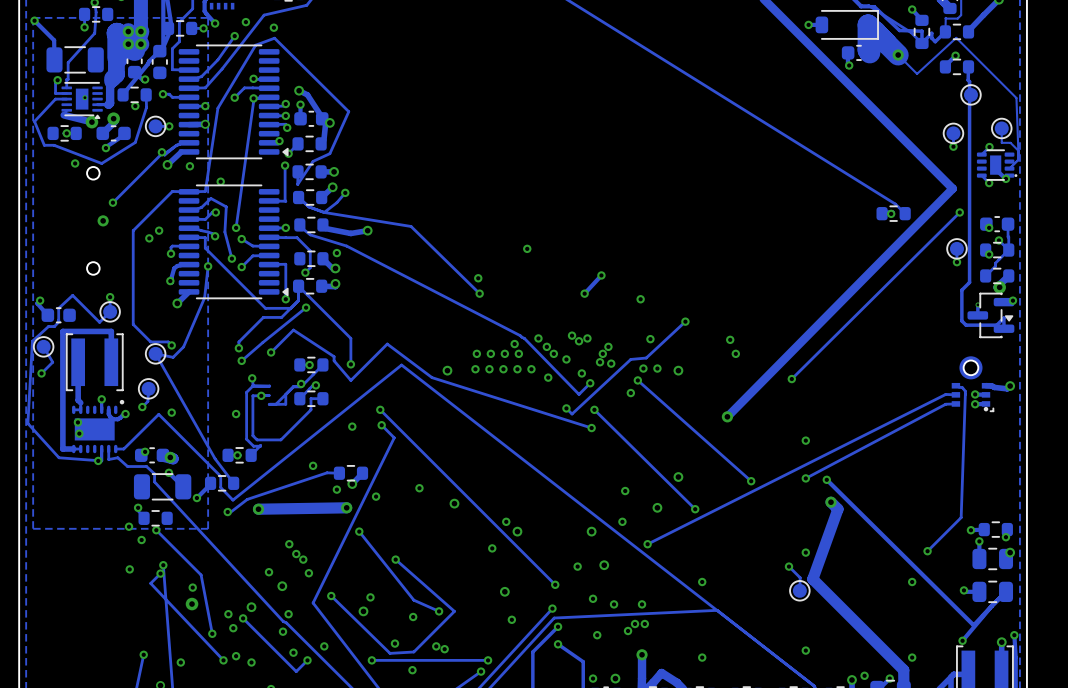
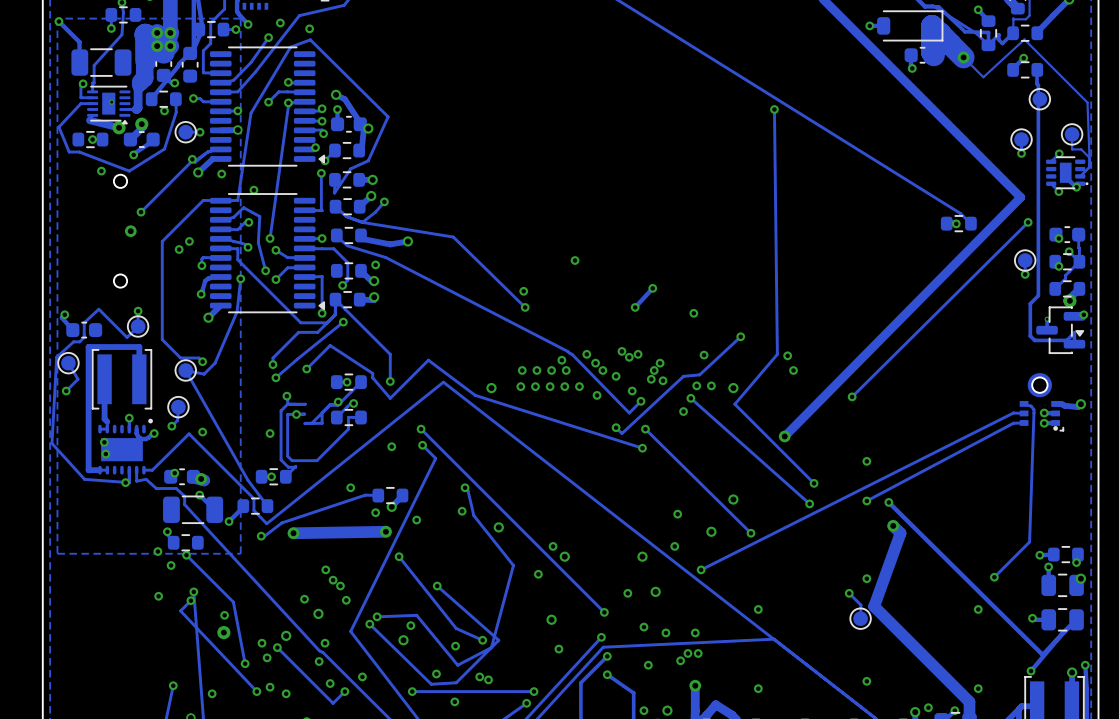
track: none -> (774, 109) (777, 354) (734, 404) (814, 483)
via: none -> (774, 109)
via: none -> (814, 483)
track: none -> (465, 487) (468, 490) (473, 515) (513, 565) (491, 647) (457, 665) (416, 615) (377, 616)
via: none -> (465, 487)
via: none -> (377, 616)

